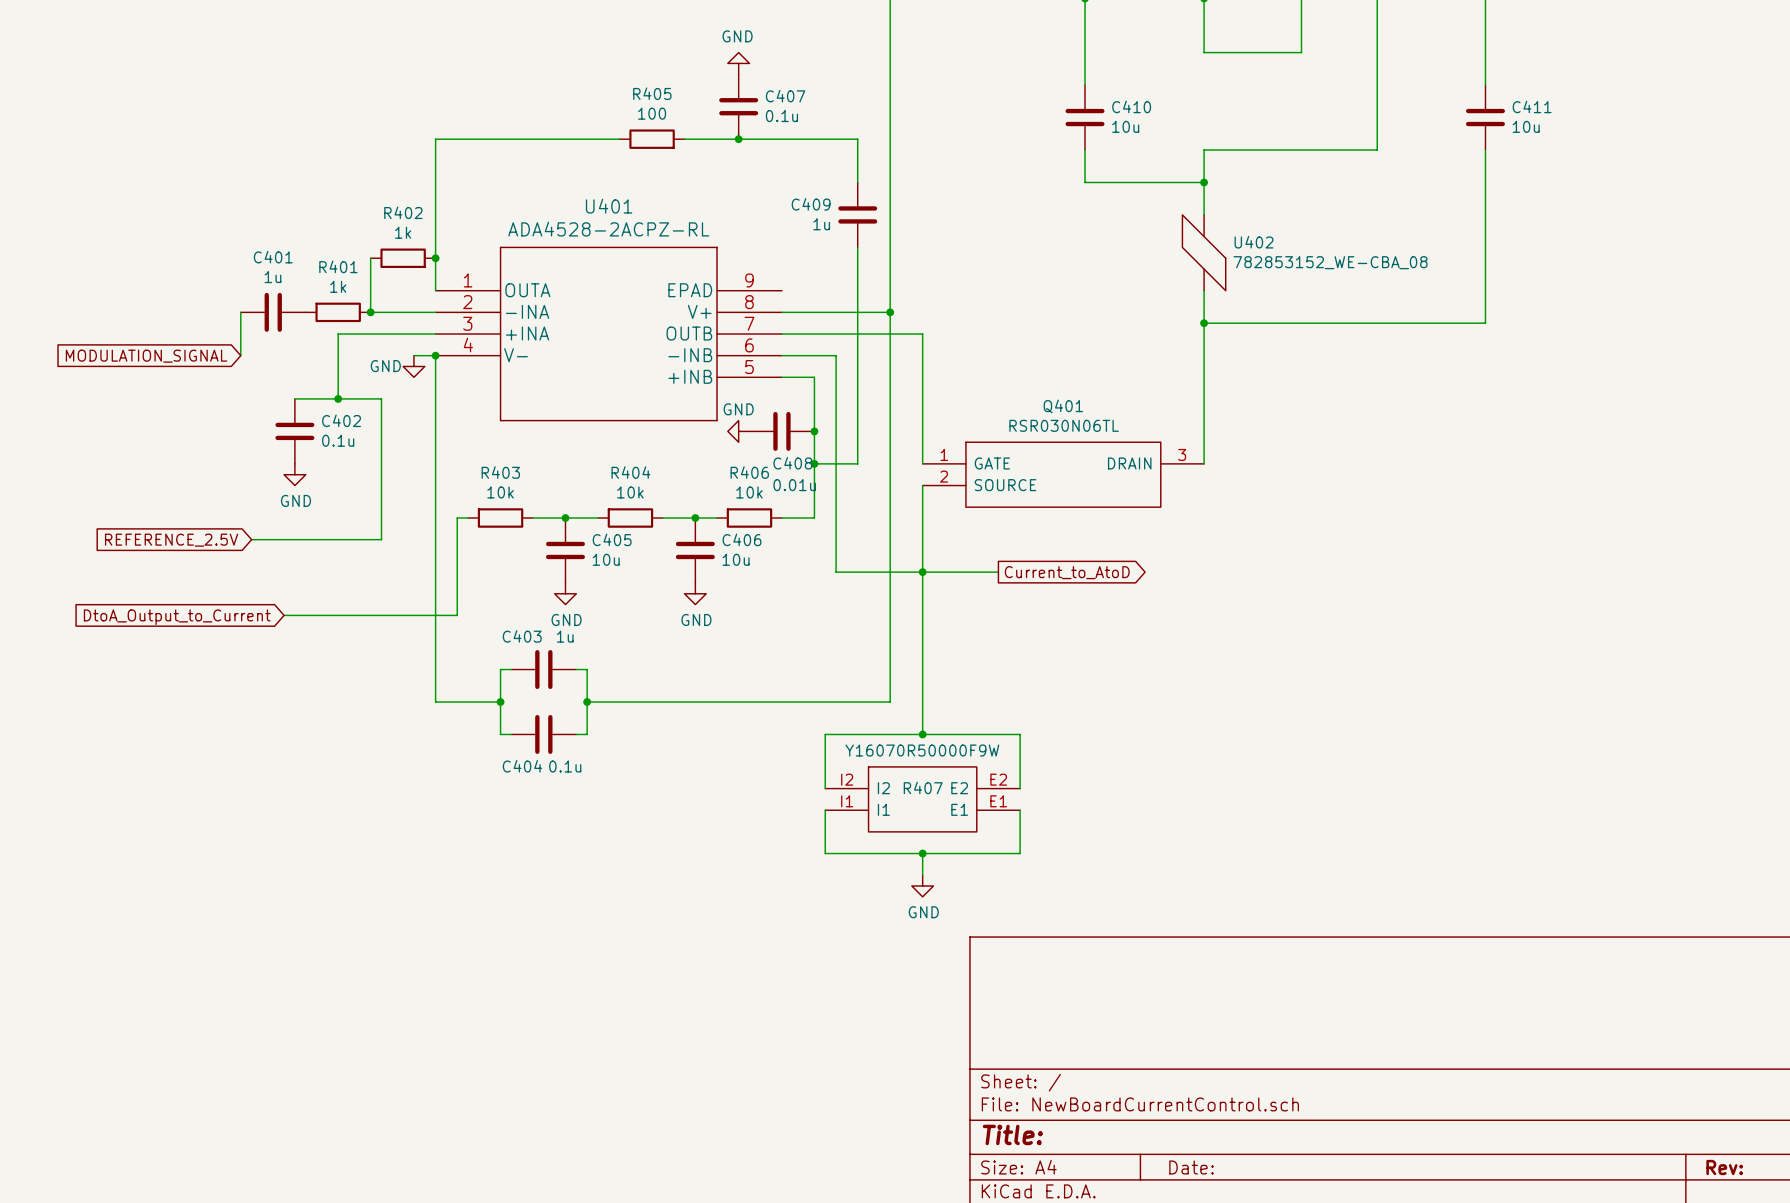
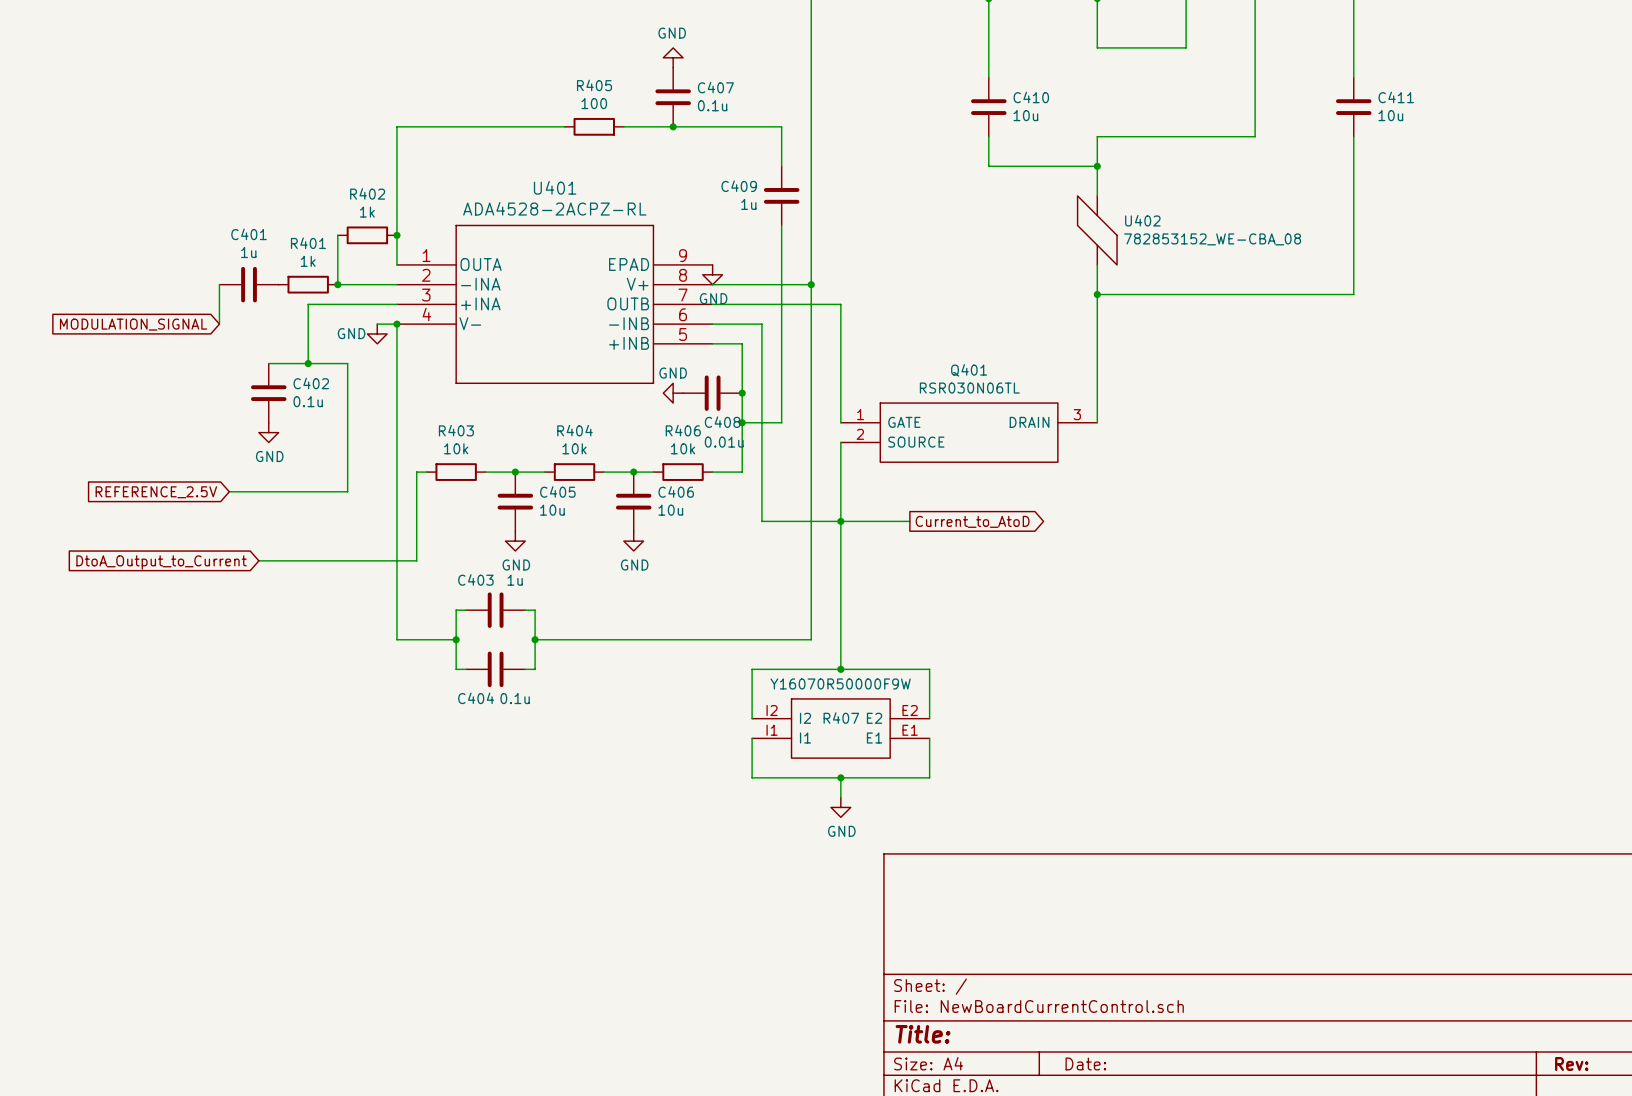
power symbol: none -> GND (712, 274)

